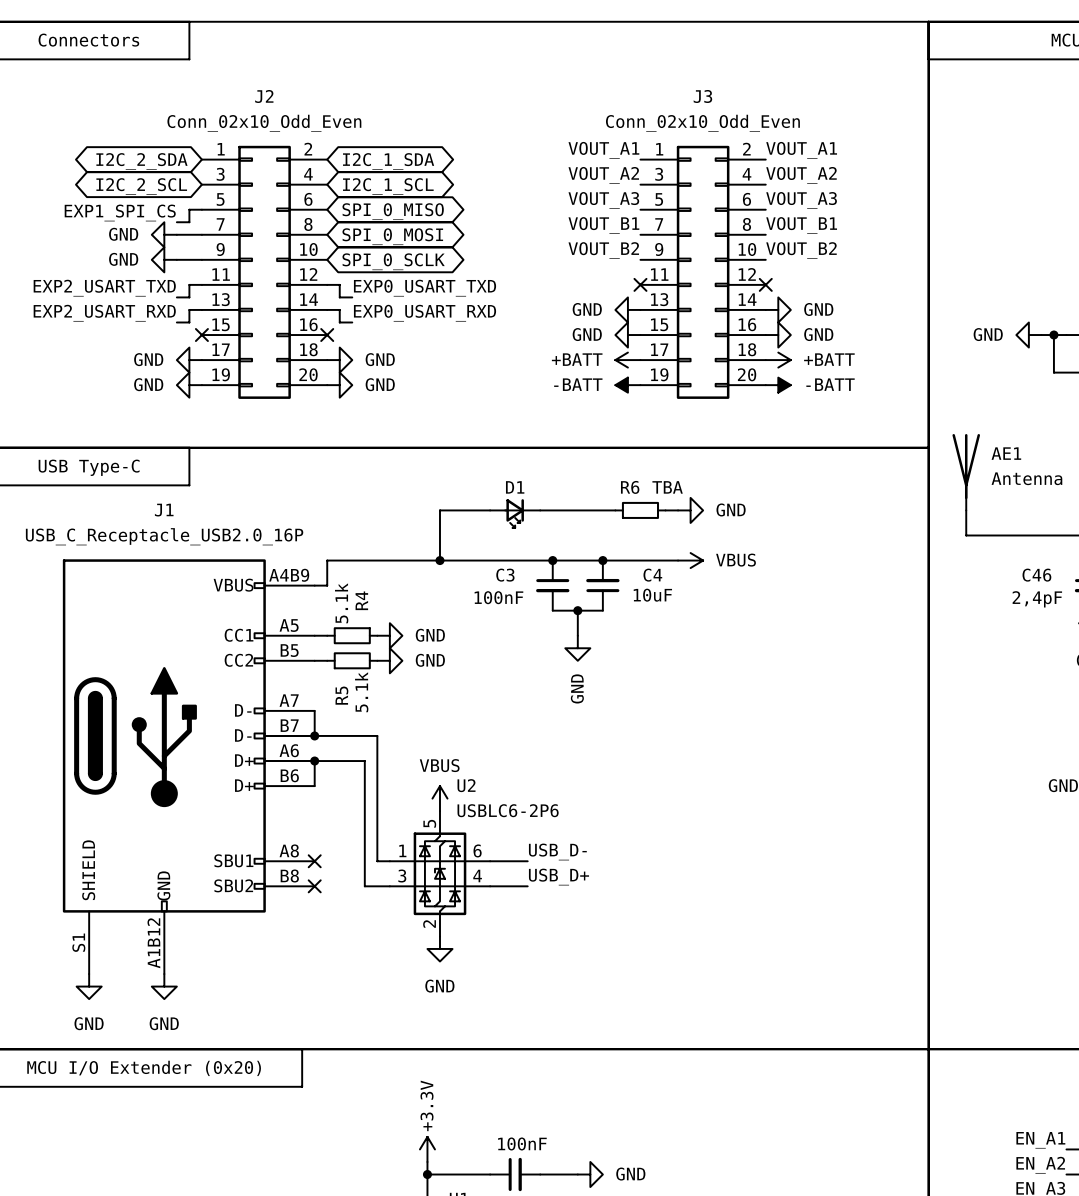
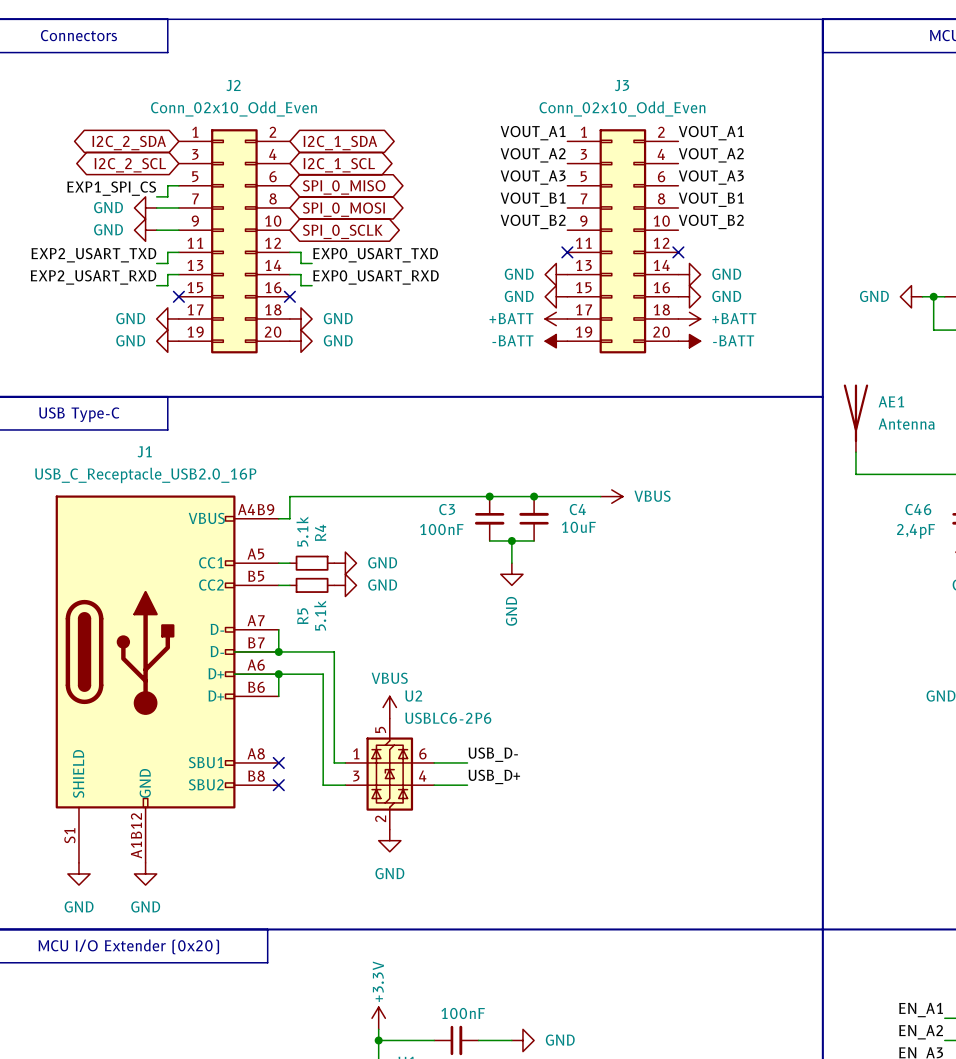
wire: (490, 510) (439, 510) (439, 560) -> none
wire: (540, 510) (615, 510) -> none
R6: TBA (640, 510) -> none
wire: (665, 510) (678, 510) -> none
power symbol: GND (690, 510) -> none
D1: (515, 513) -> none
junction: (439, 560) -> none

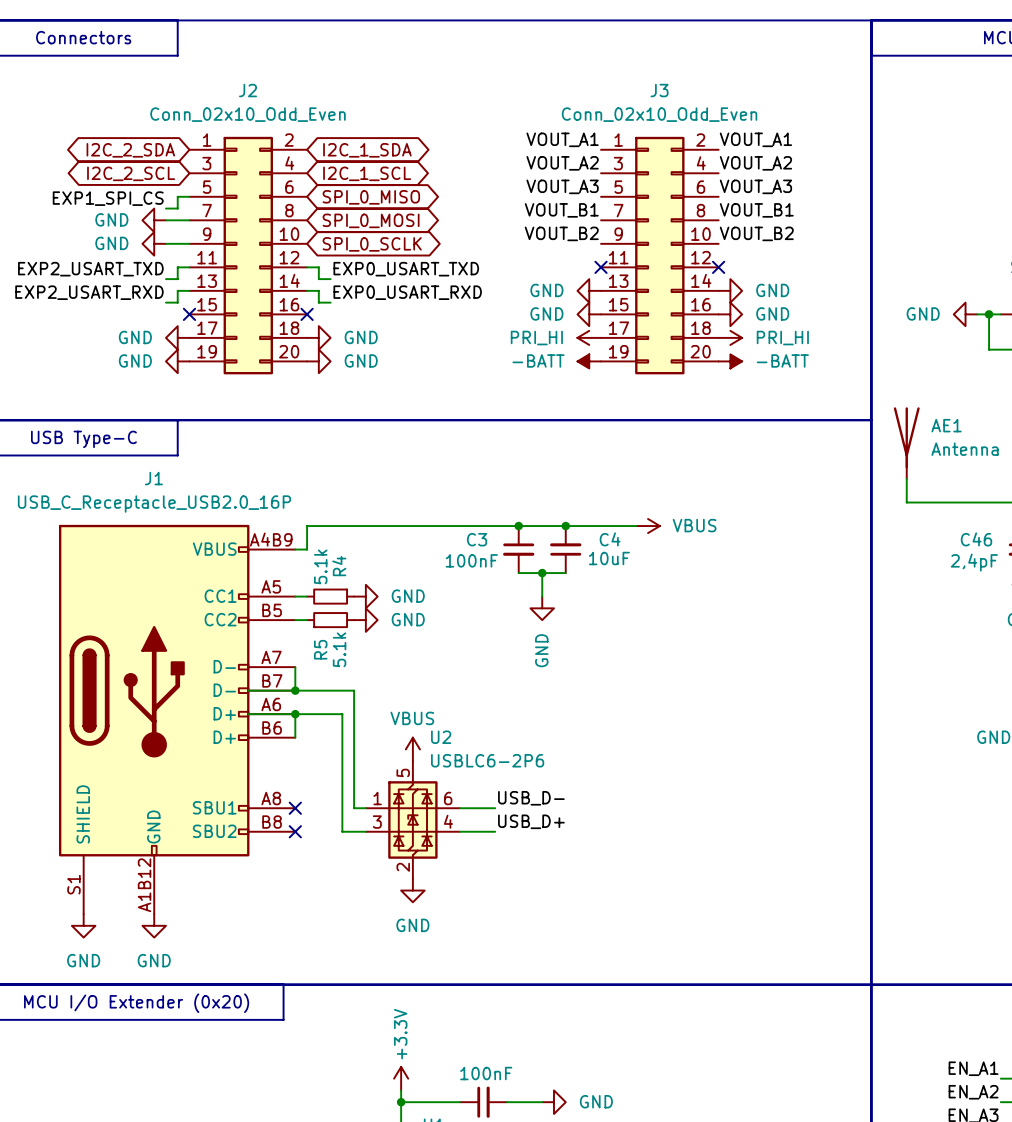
power symbol: +BATT (556, 318) -> PRI_HI (589, 337)
power symbol: +BATT (689, 318) -> PRI_HI (730, 337)

